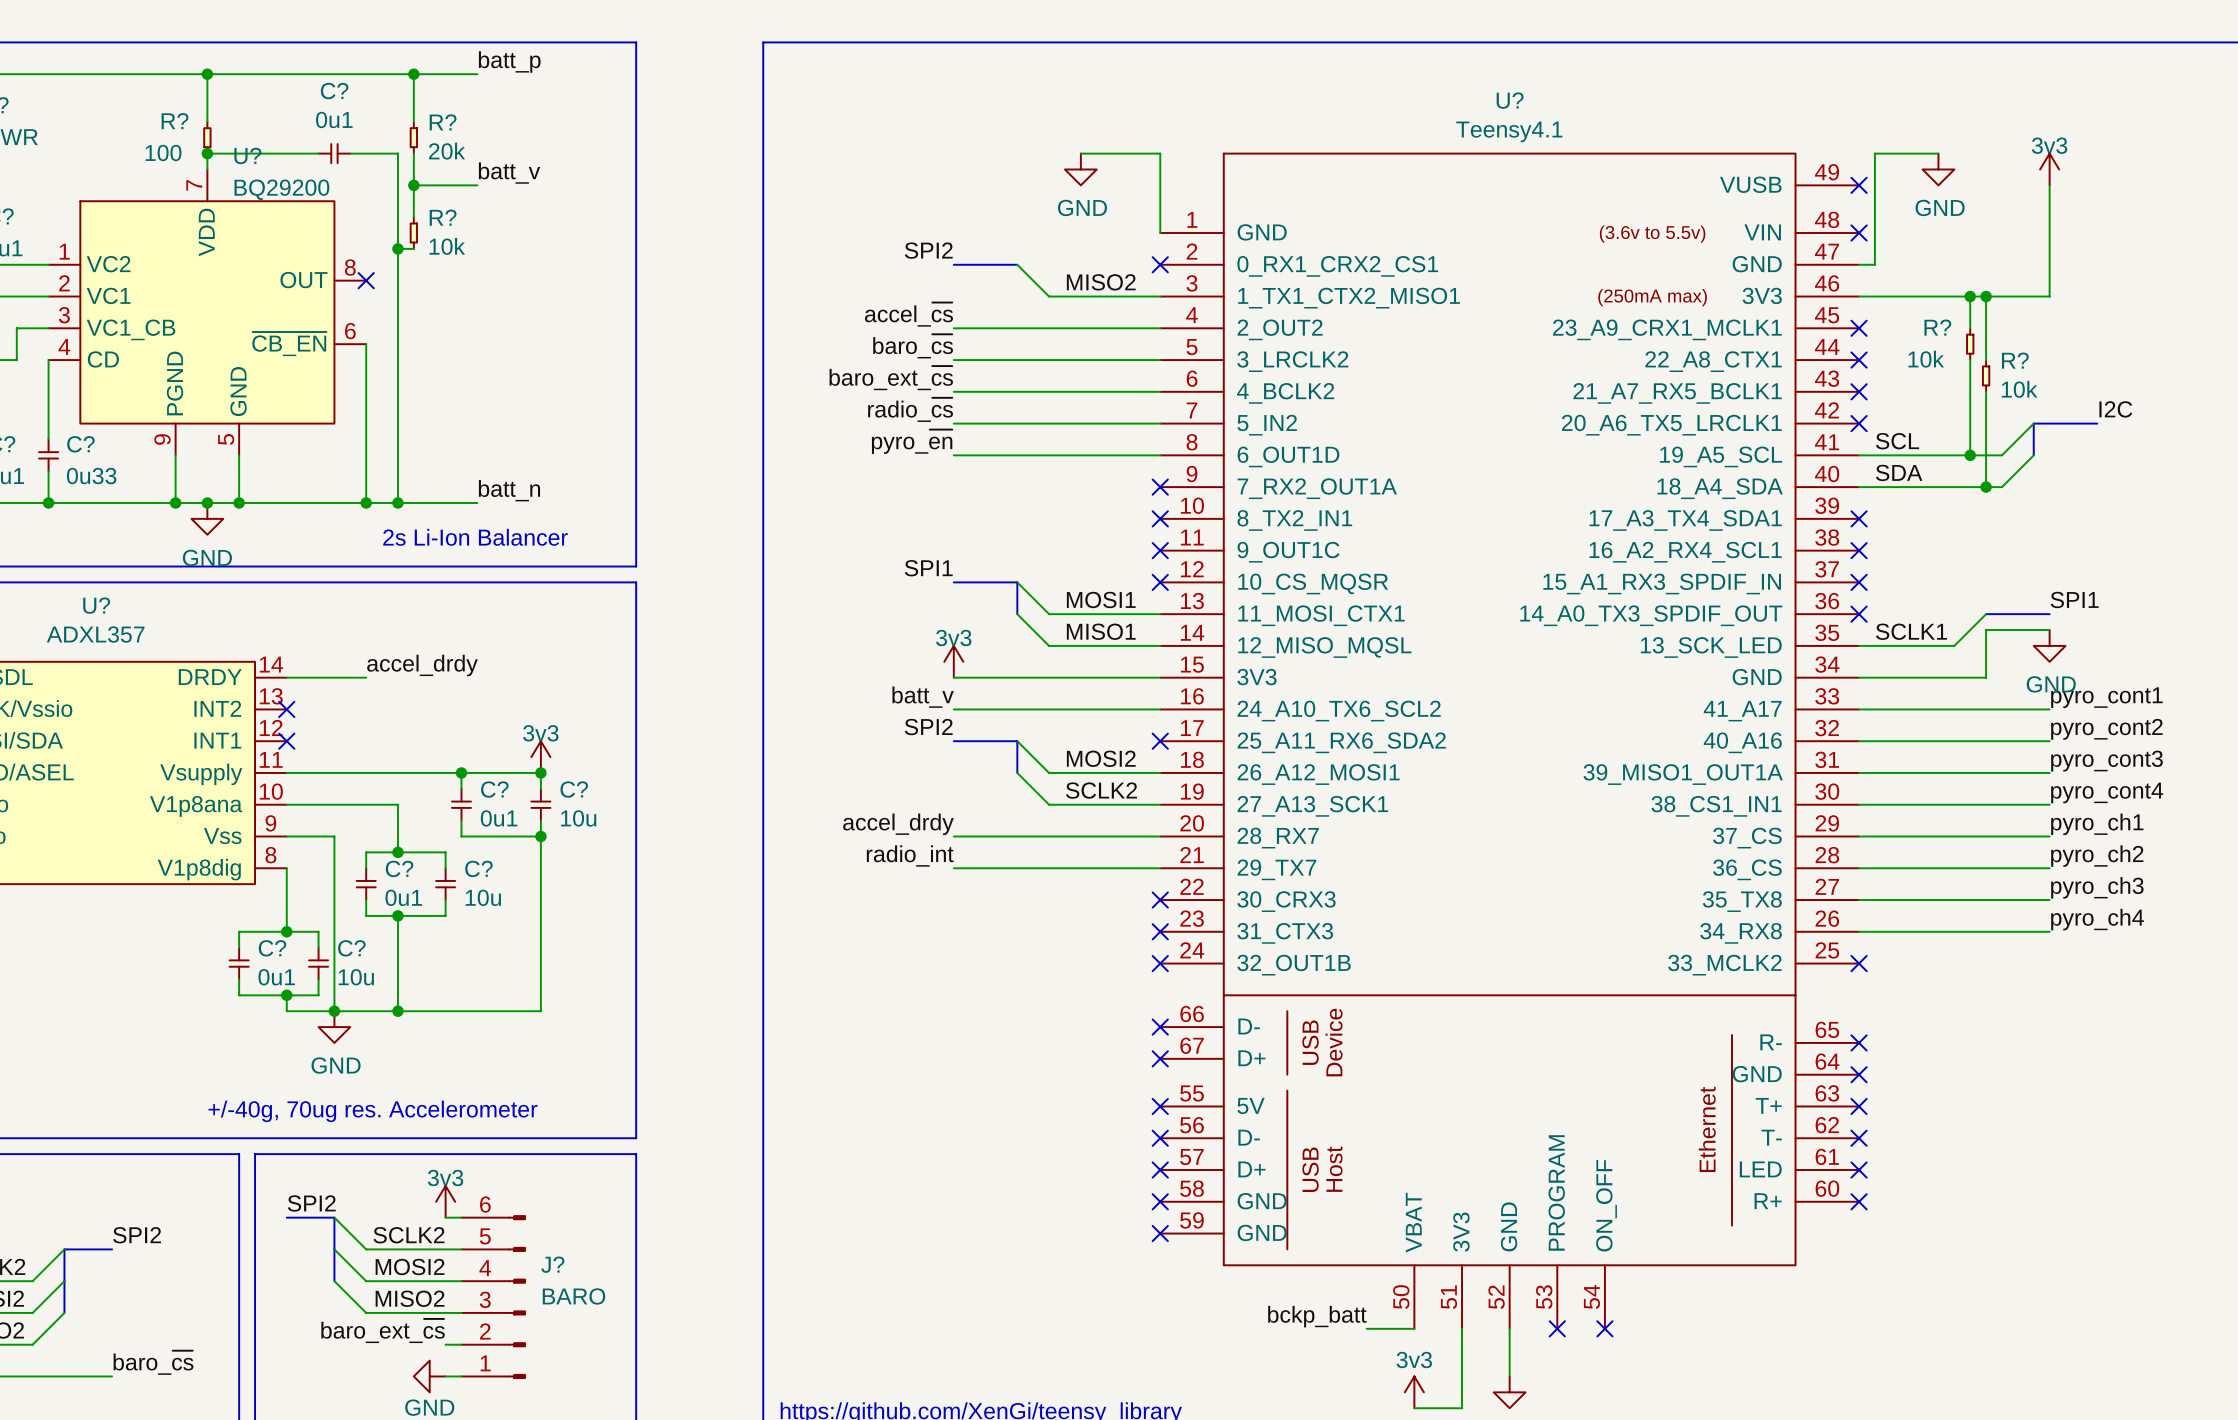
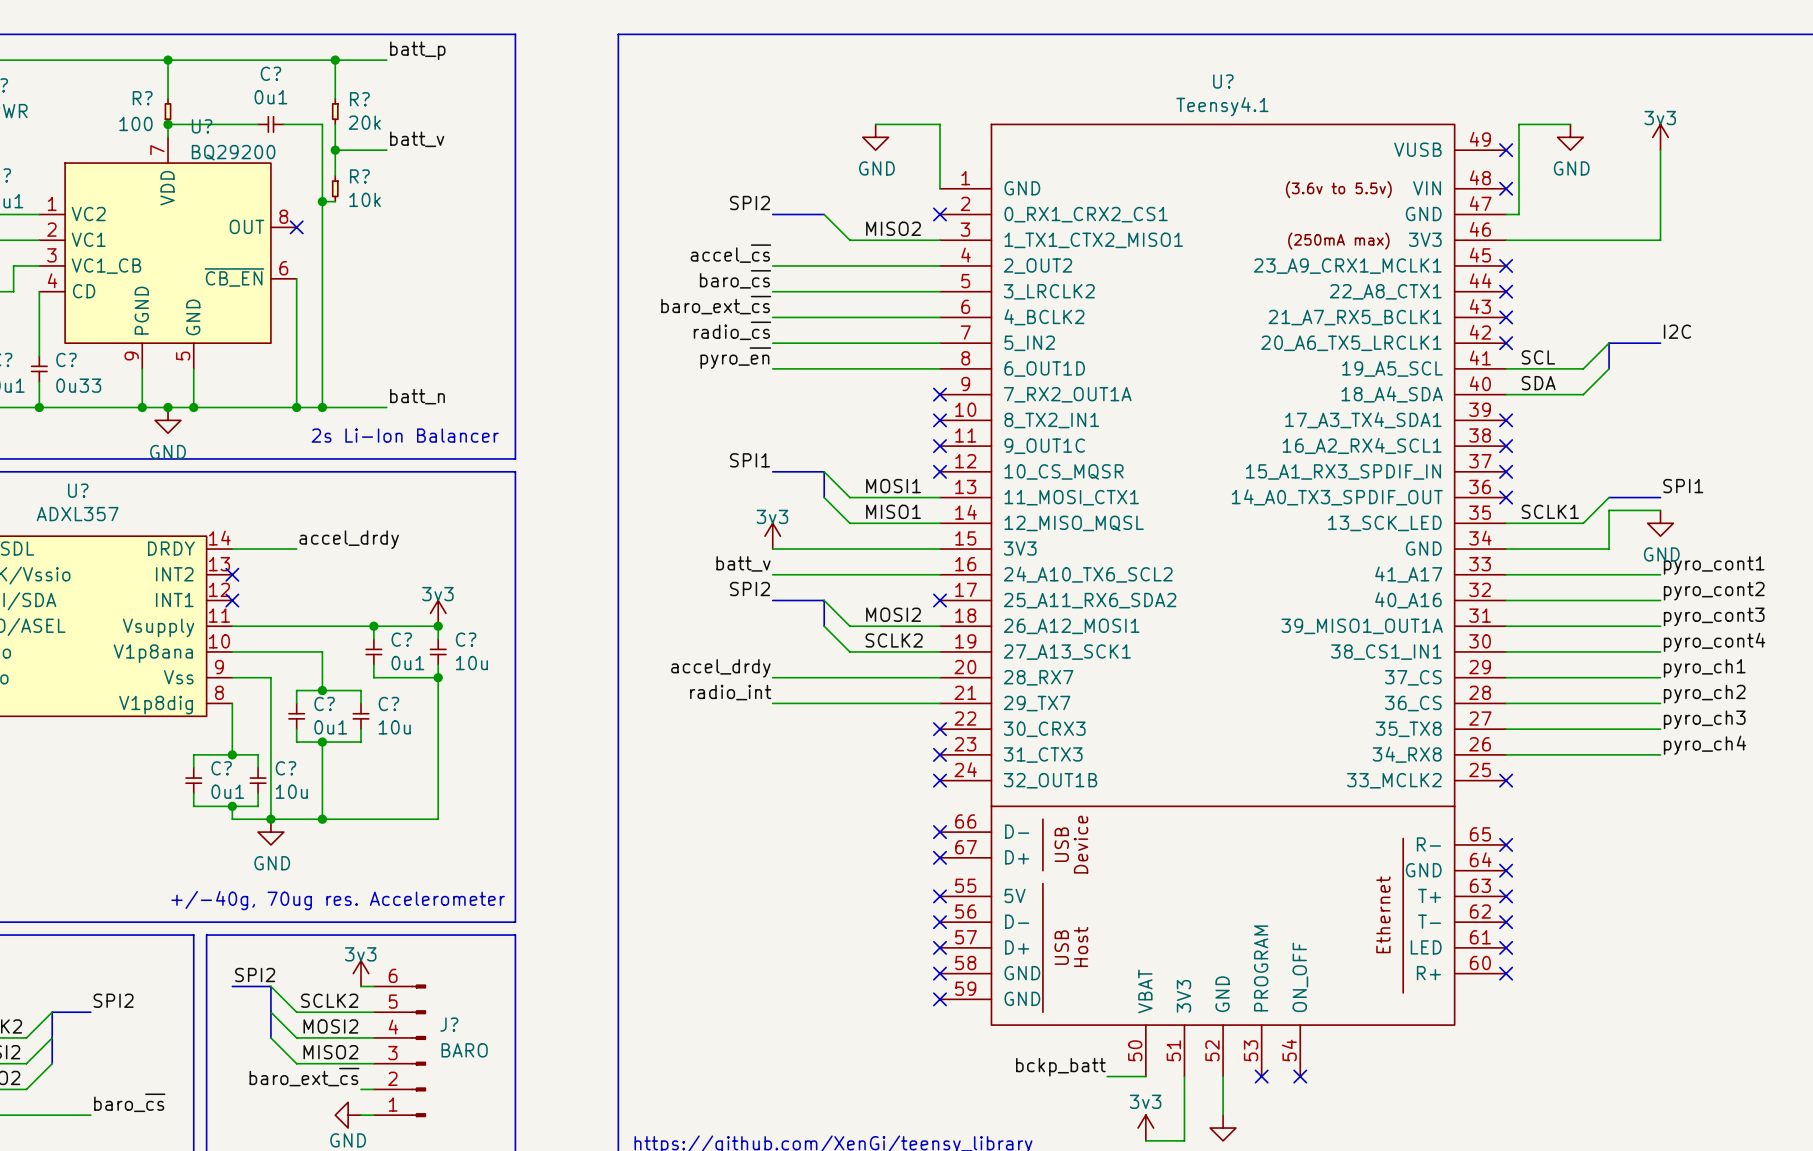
wire: (1970, 296) (1970, 328) -> none
junction: (1970, 296) -> none
wire: (1986, 296) (1986, 360) -> none
junction: (1986, 296) -> none
R?: 10k (1970, 344) -> none
wire: (1970, 360) (1970, 455) -> none
R?: 10k (1986, 375) -> none
wire: (1986, 391) (1986, 487) -> none
label position: I2C (2115, 409) -> I2C (1677, 331)
wire: (2033, 423) (2001, 455) (1954, 455) -> (1609, 343) (1583, 368)
bus: (2033, 423) (2033, 455) -> (1647, 343) (1609, 343) (1609, 368)
bus: (2049, 423) (2097, 423) -> none
junction: (1970, 455) -> none
wire: (2033, 455) (2001, 487) (1954, 487) -> (1609, 368) (1583, 394)
junction: (1986, 487) -> none

